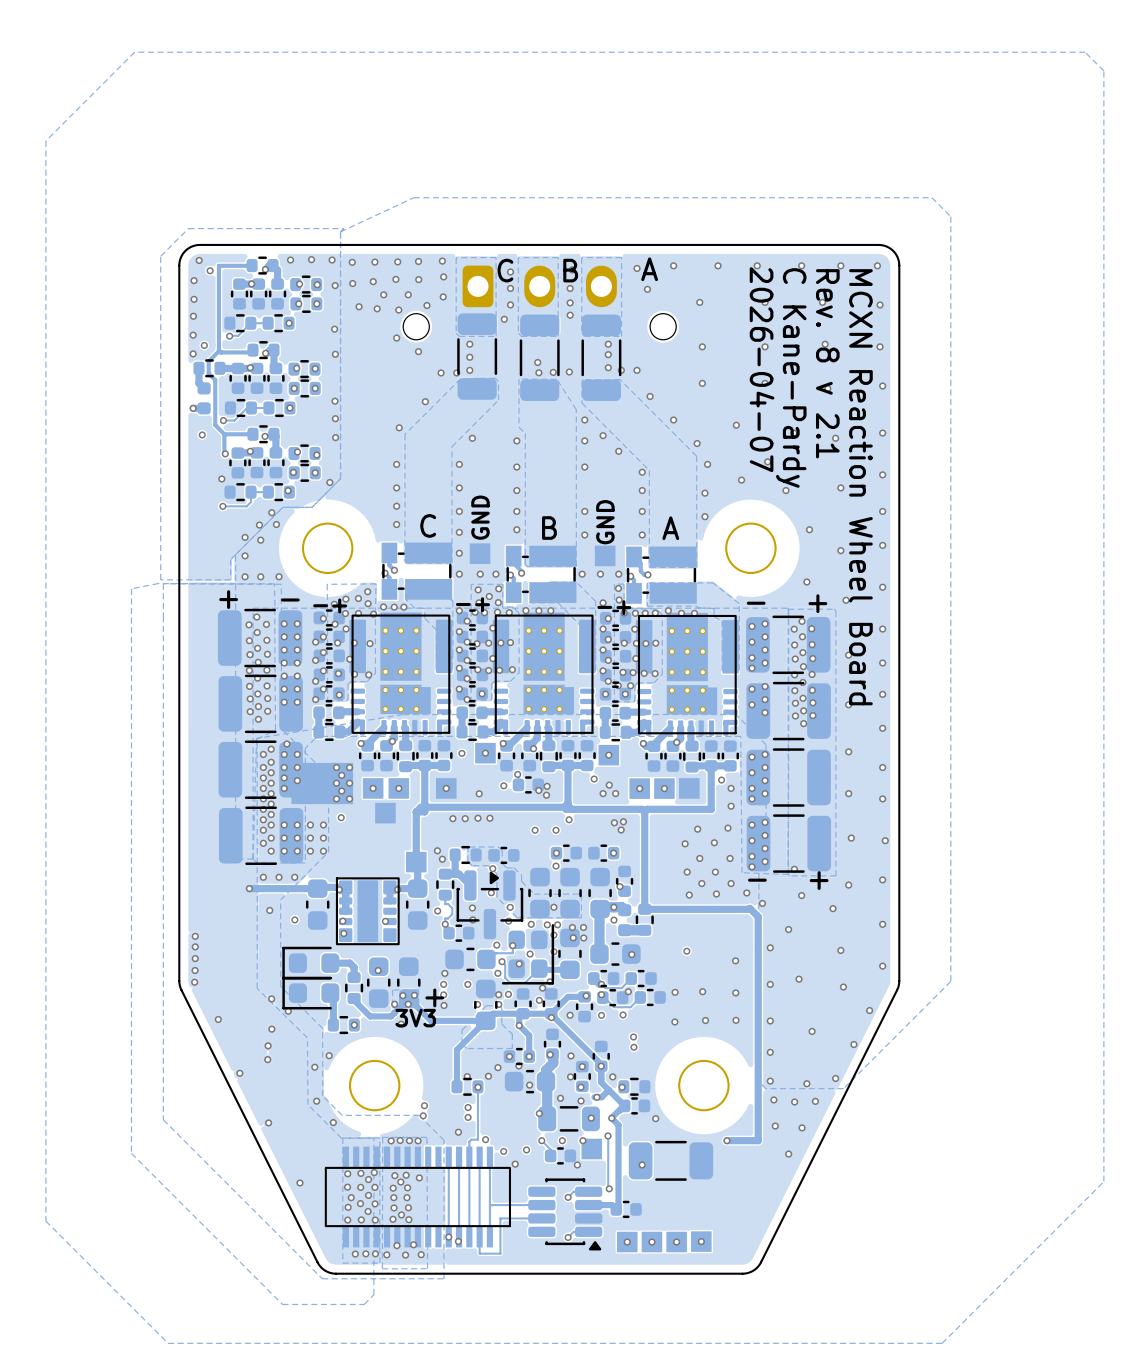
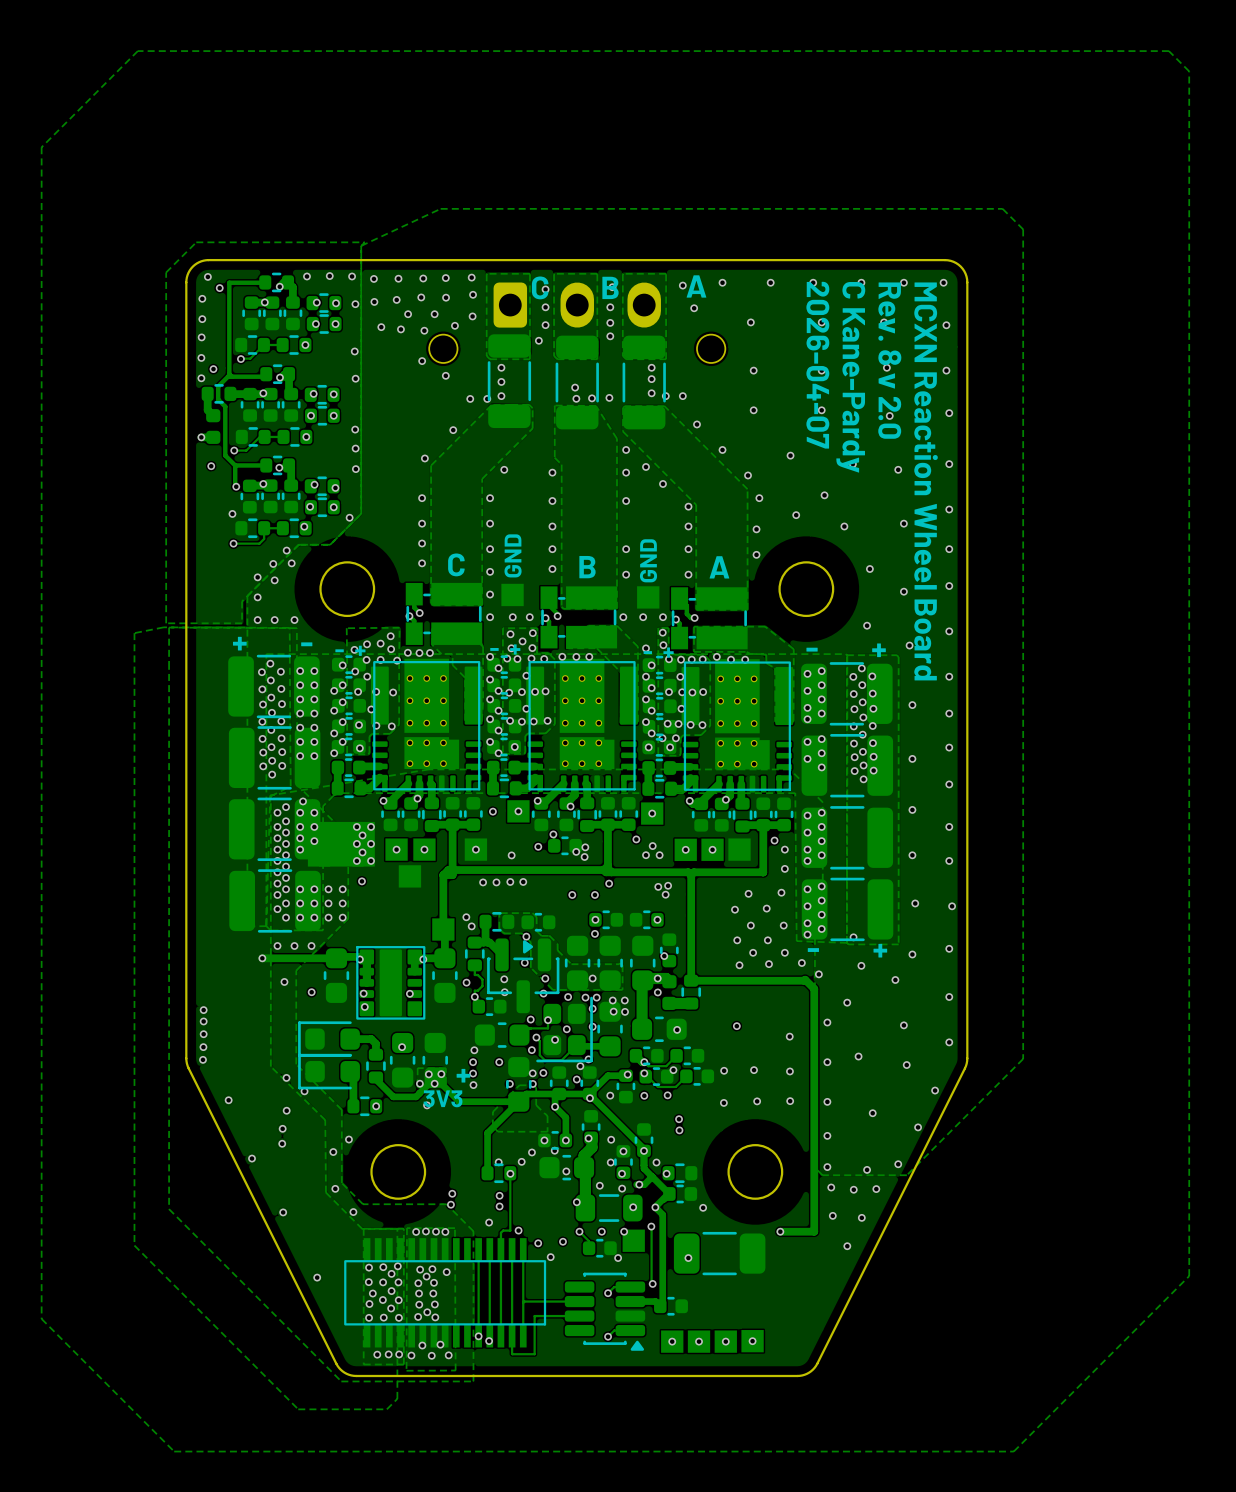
text: Rev. 8 v 2.1 (827, 363) -> Rev. 8 v 2.0 (889, 360)

